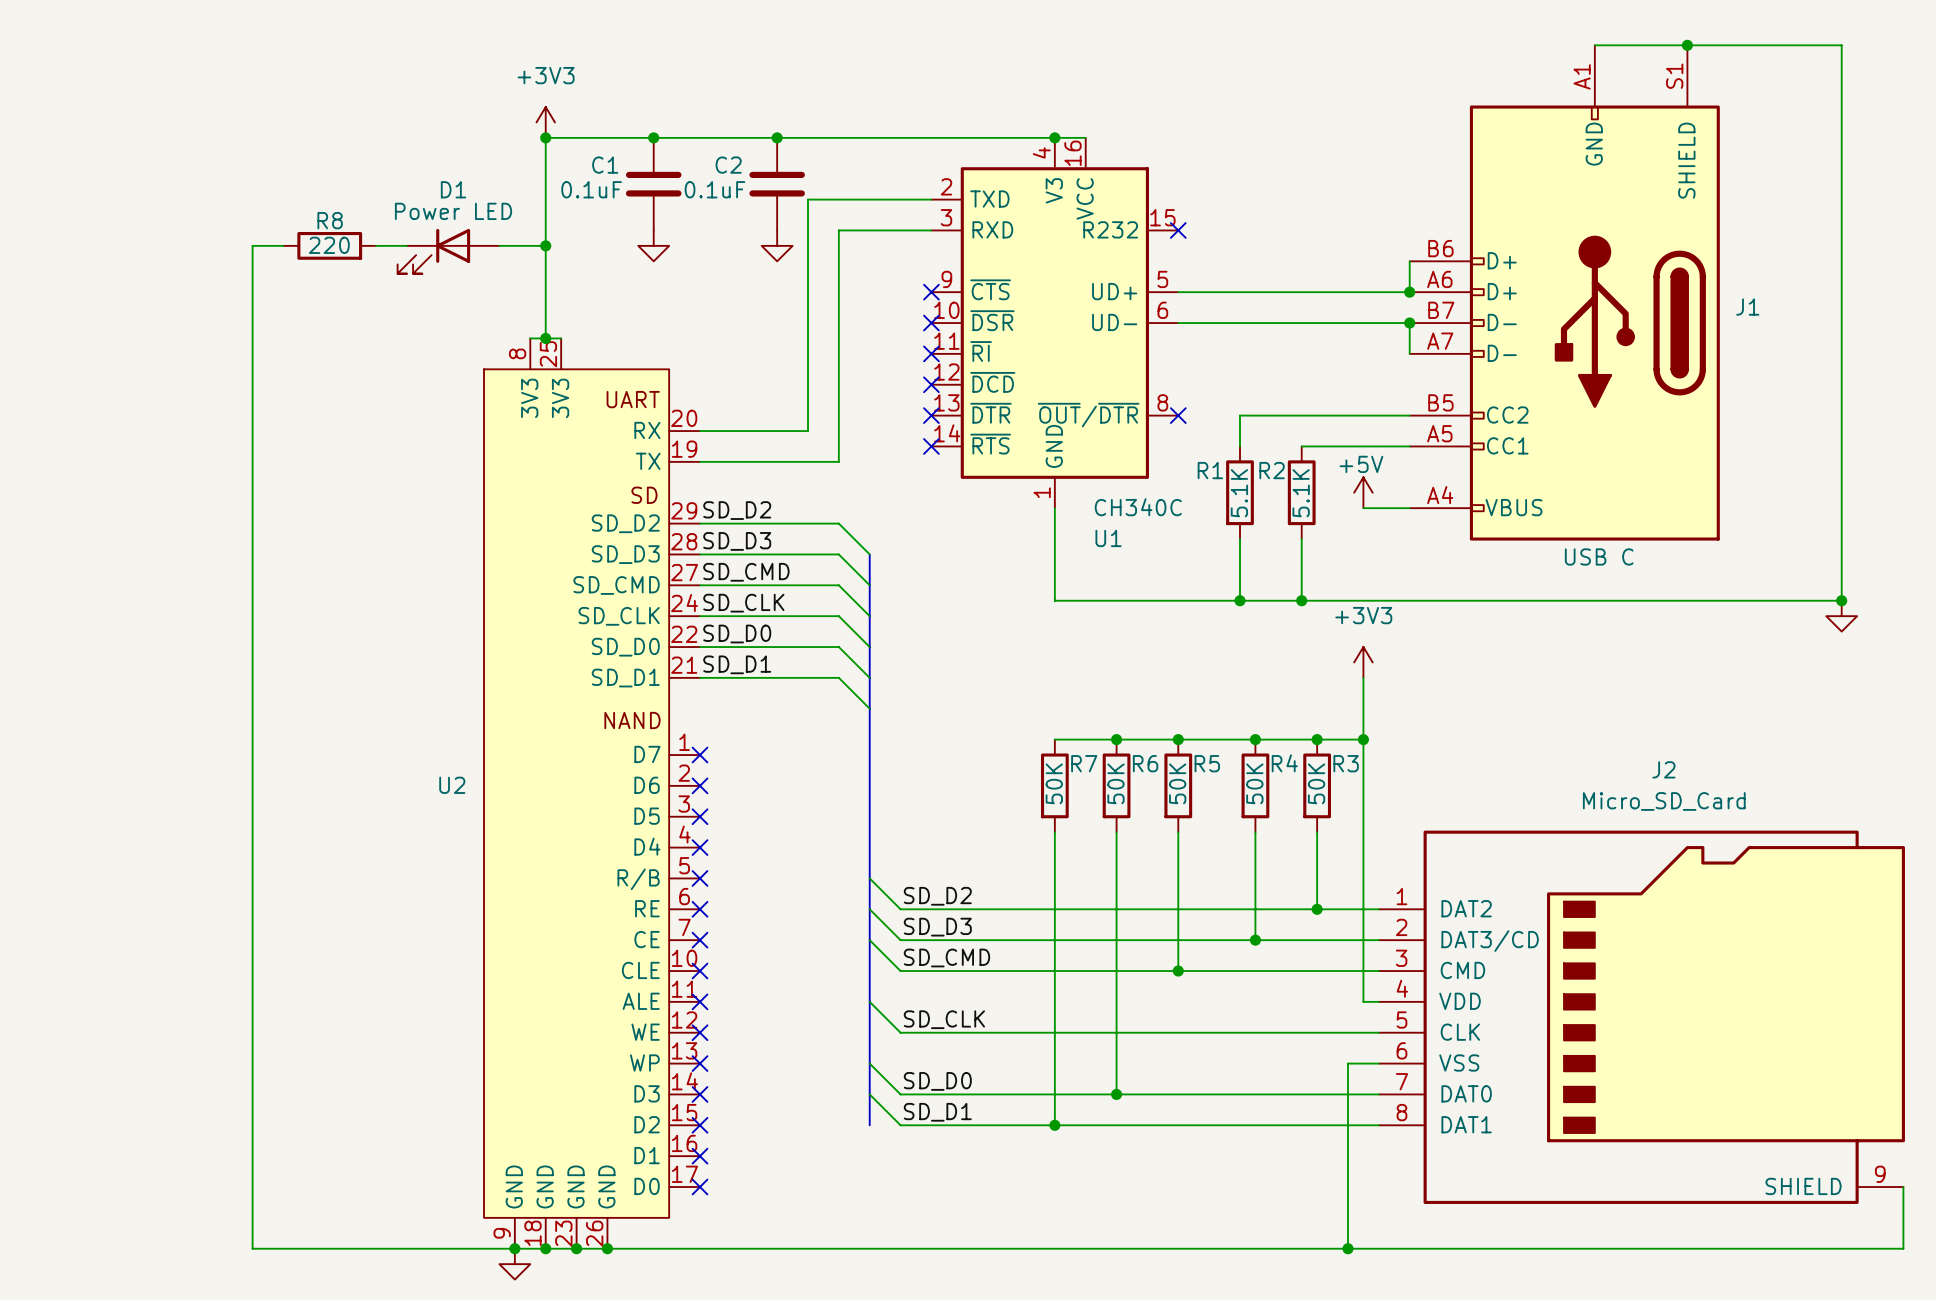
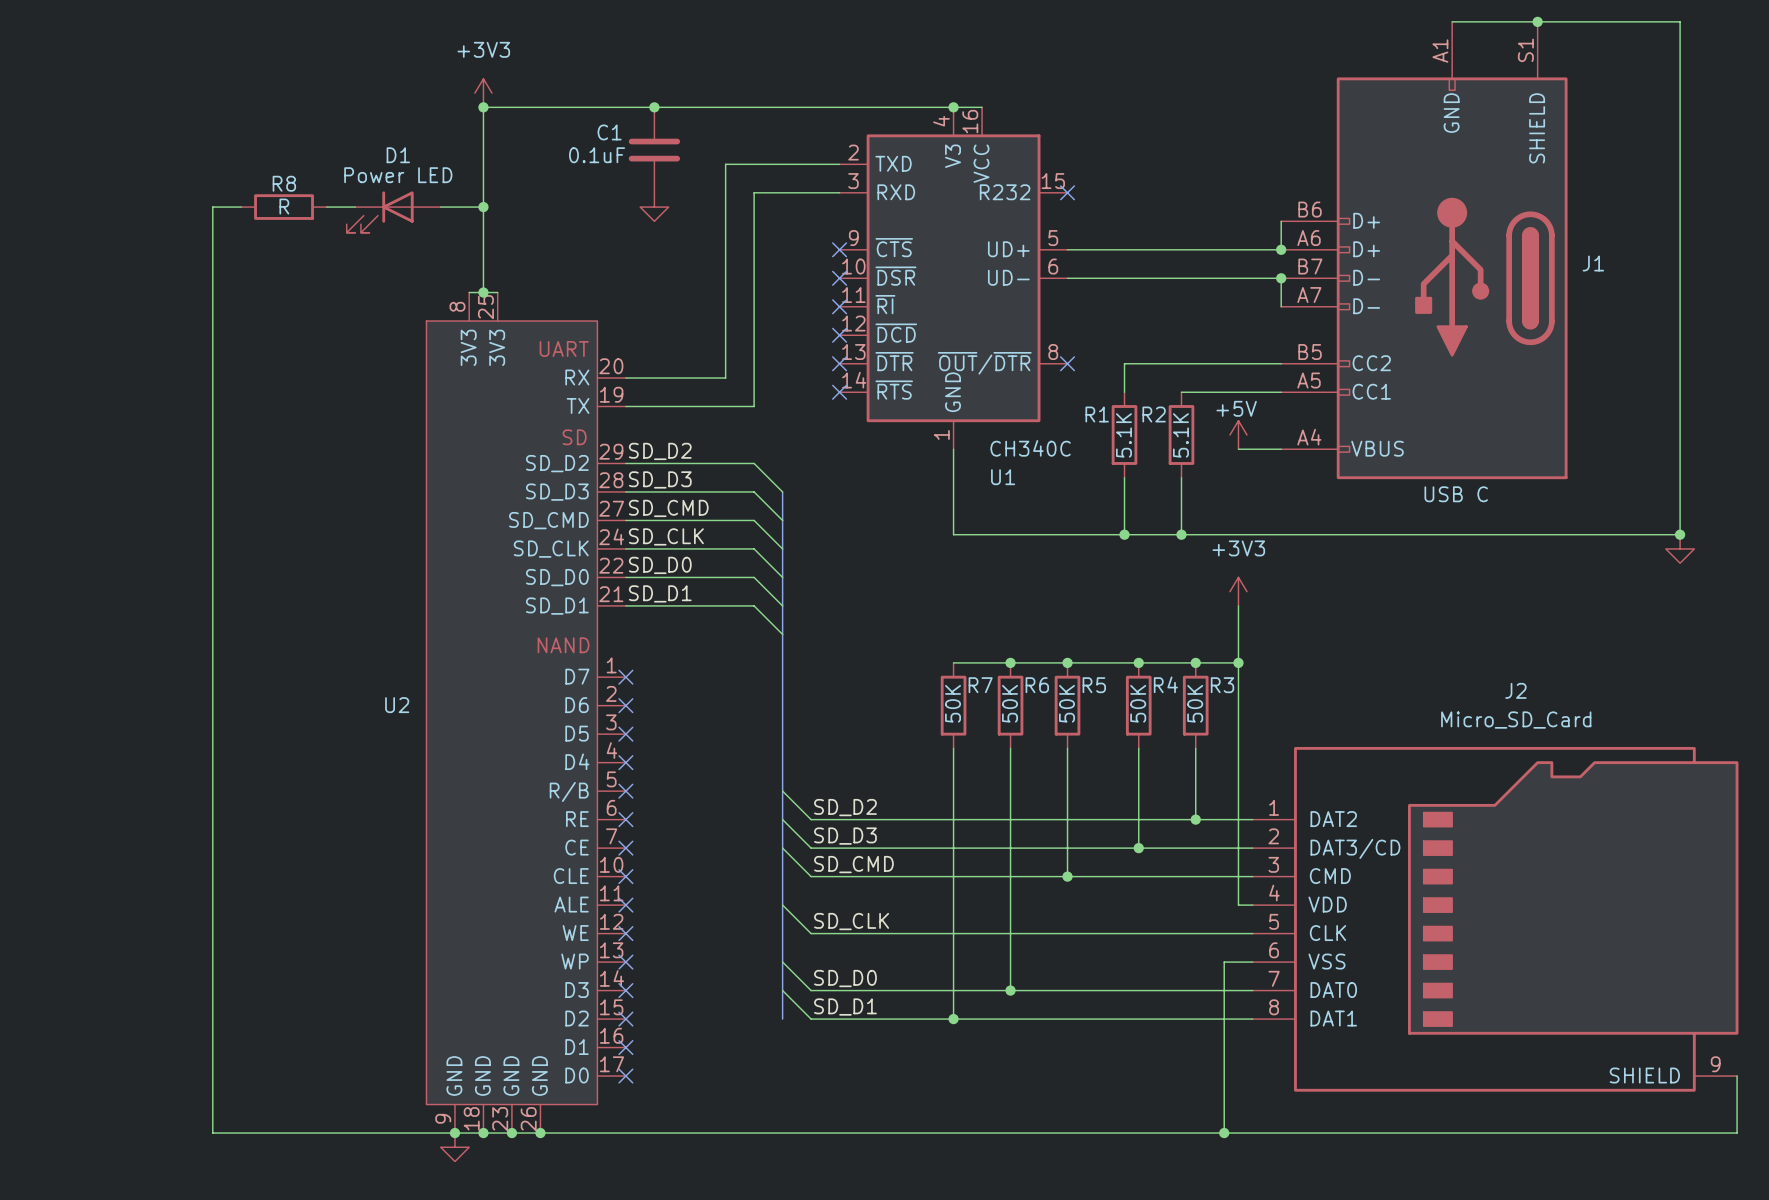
junction: (653, 137) -> none
junction: none -> (654, 107)
junction: (777, 137) -> none
C1 position: (653, 184) -> (654, 150)
C2: 0.1uF (777, 184) -> none
R8 value: 220 (329, 245) -> R (284, 206)
power symbol: (653, 245) -> none
power symbol: none -> (654, 207)
power symbol: (777, 245) -> none

